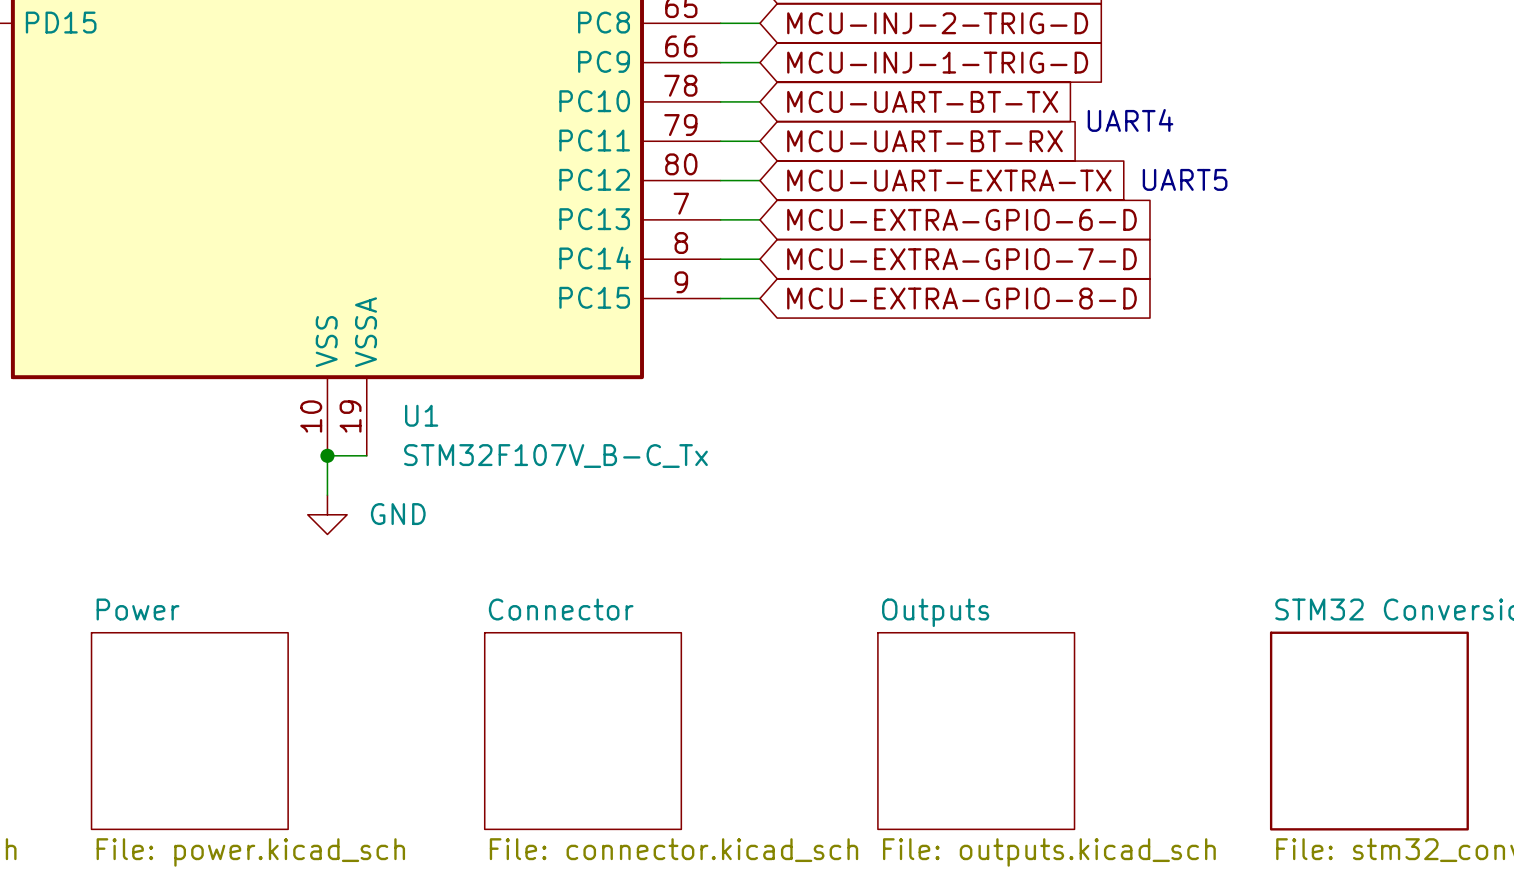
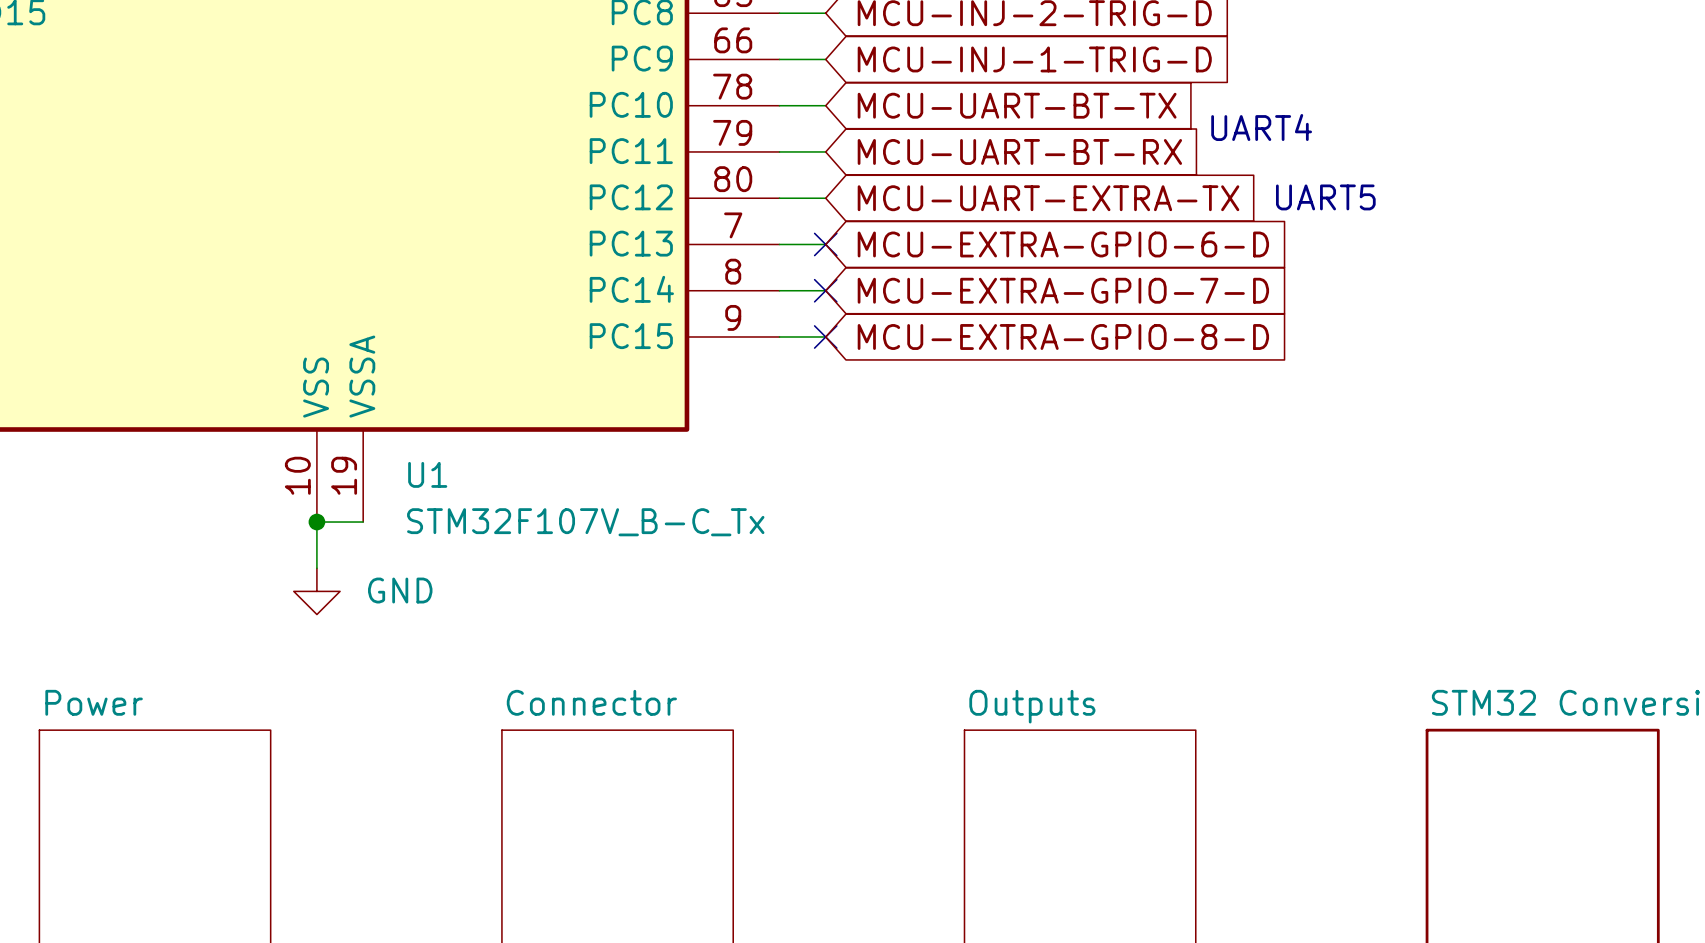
no-connect mark: none -> (825, 244)
no-connect mark: none -> (825, 290)
no-connect mark: none -> (825, 336)

